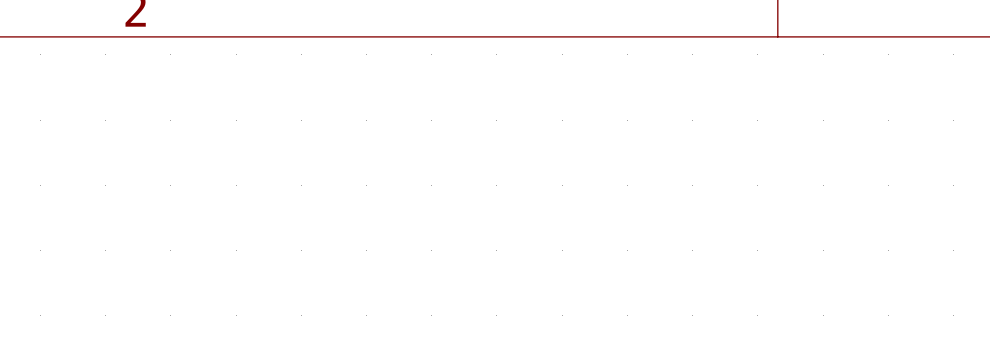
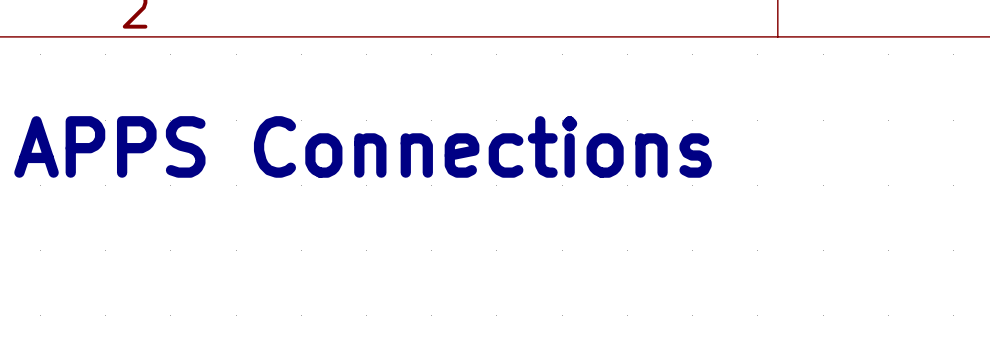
text: none -> APPS Connections (362, 146)

